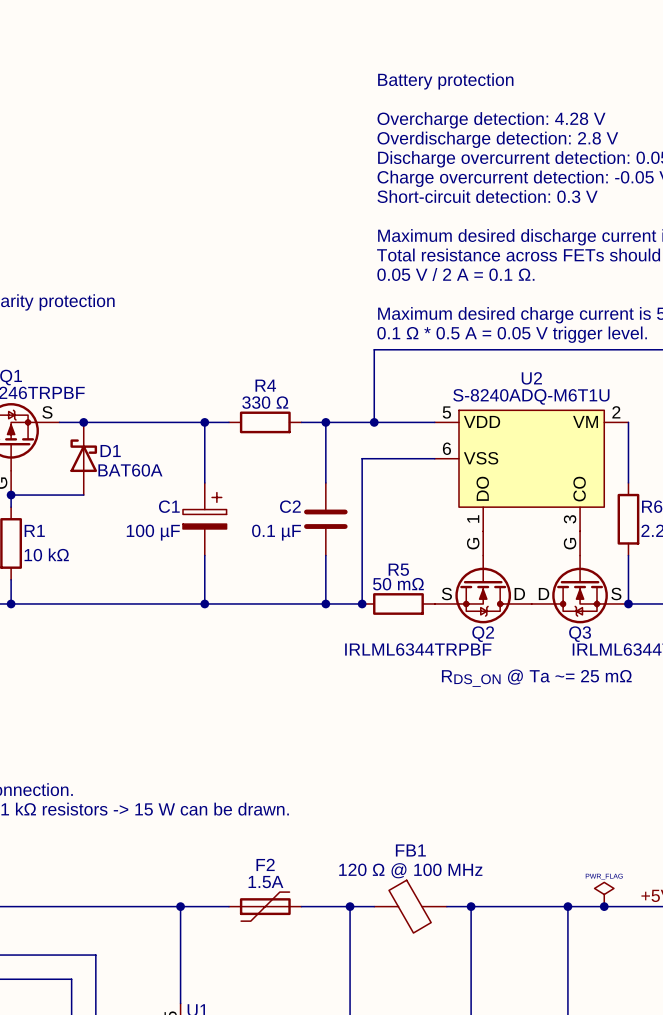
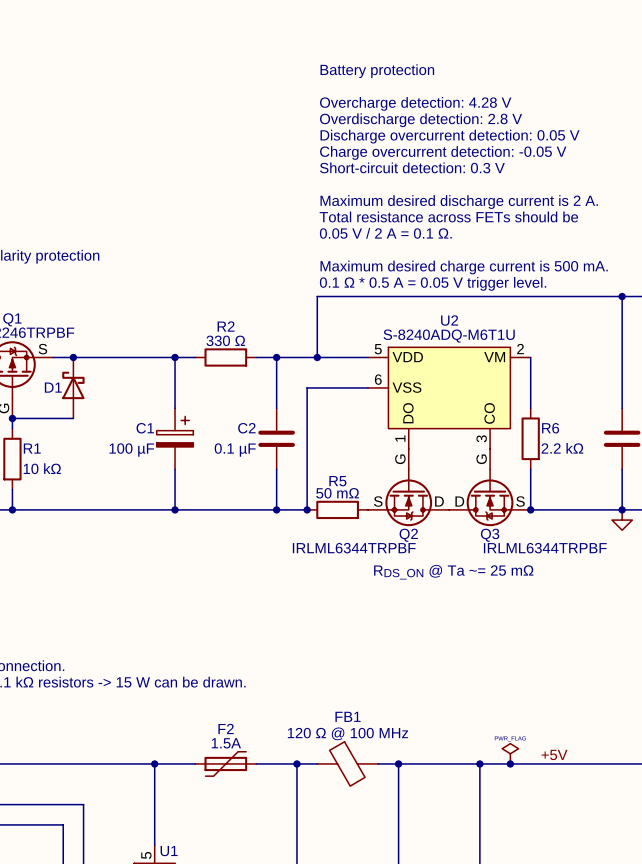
R4 name: R4 (265, 385) -> R2 (226, 326)
D1 name position: D1 (110, 451) -> D1 (53, 387)
D1 value: BAT60A (130, 470) -> none

